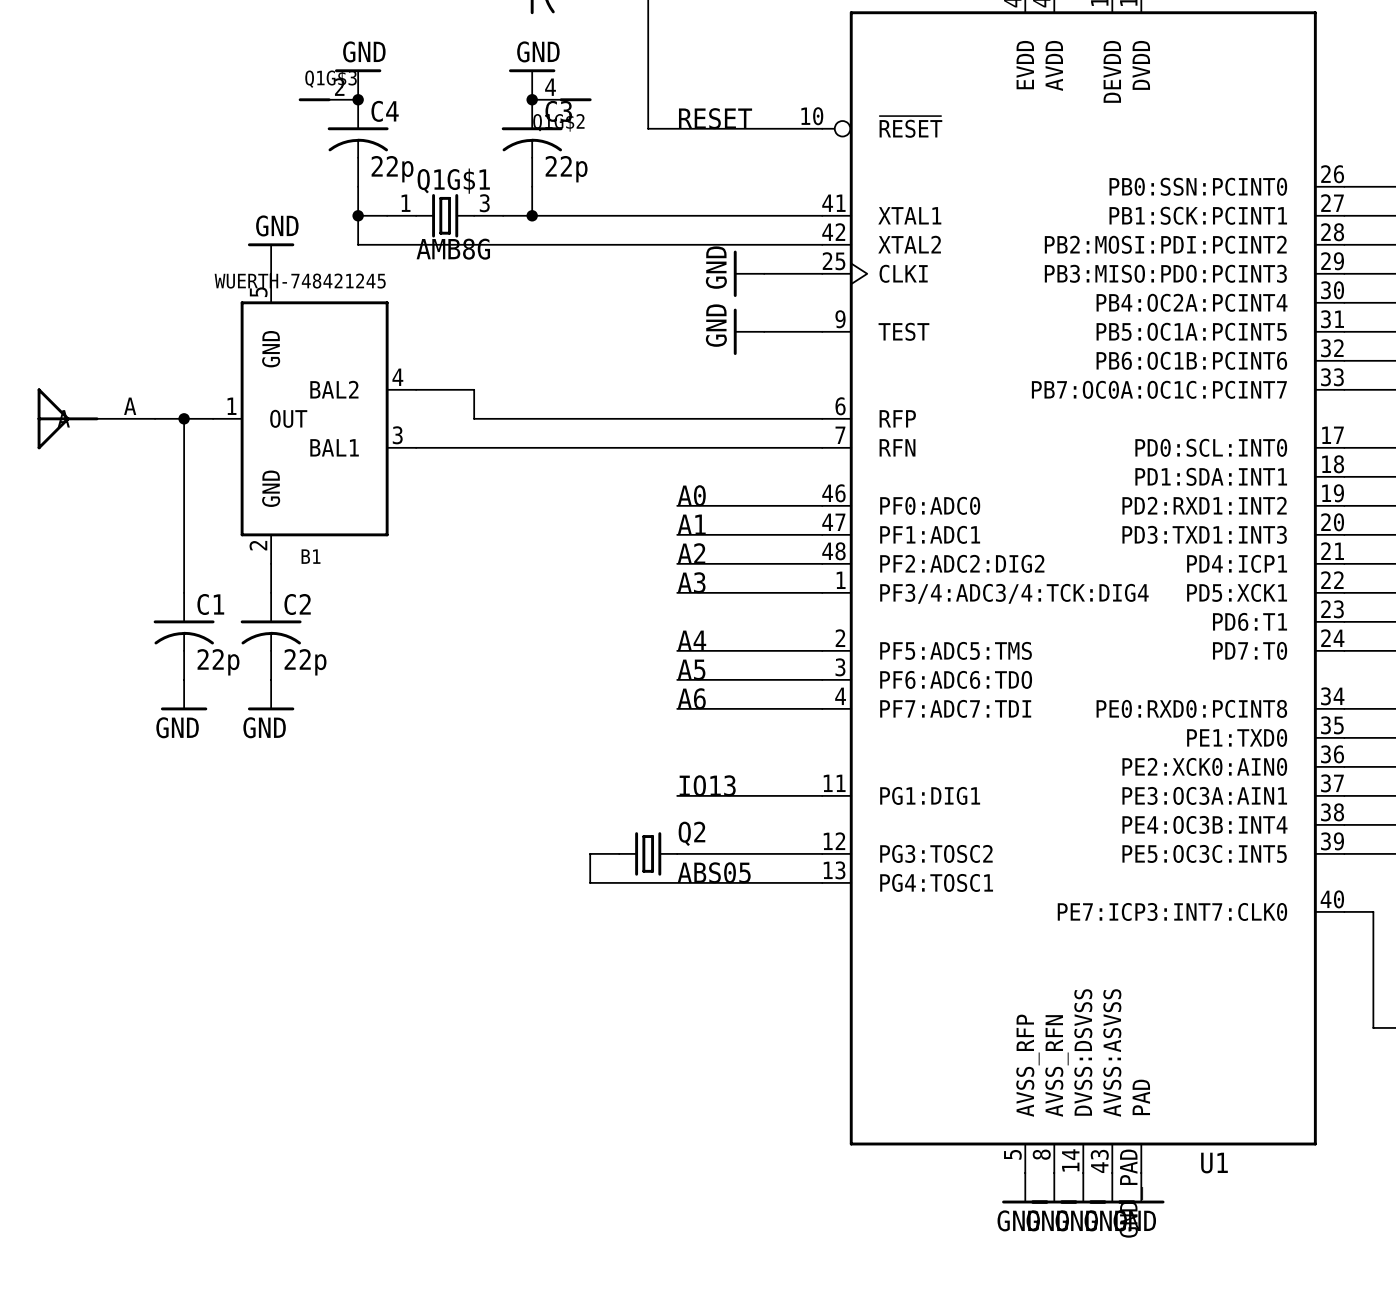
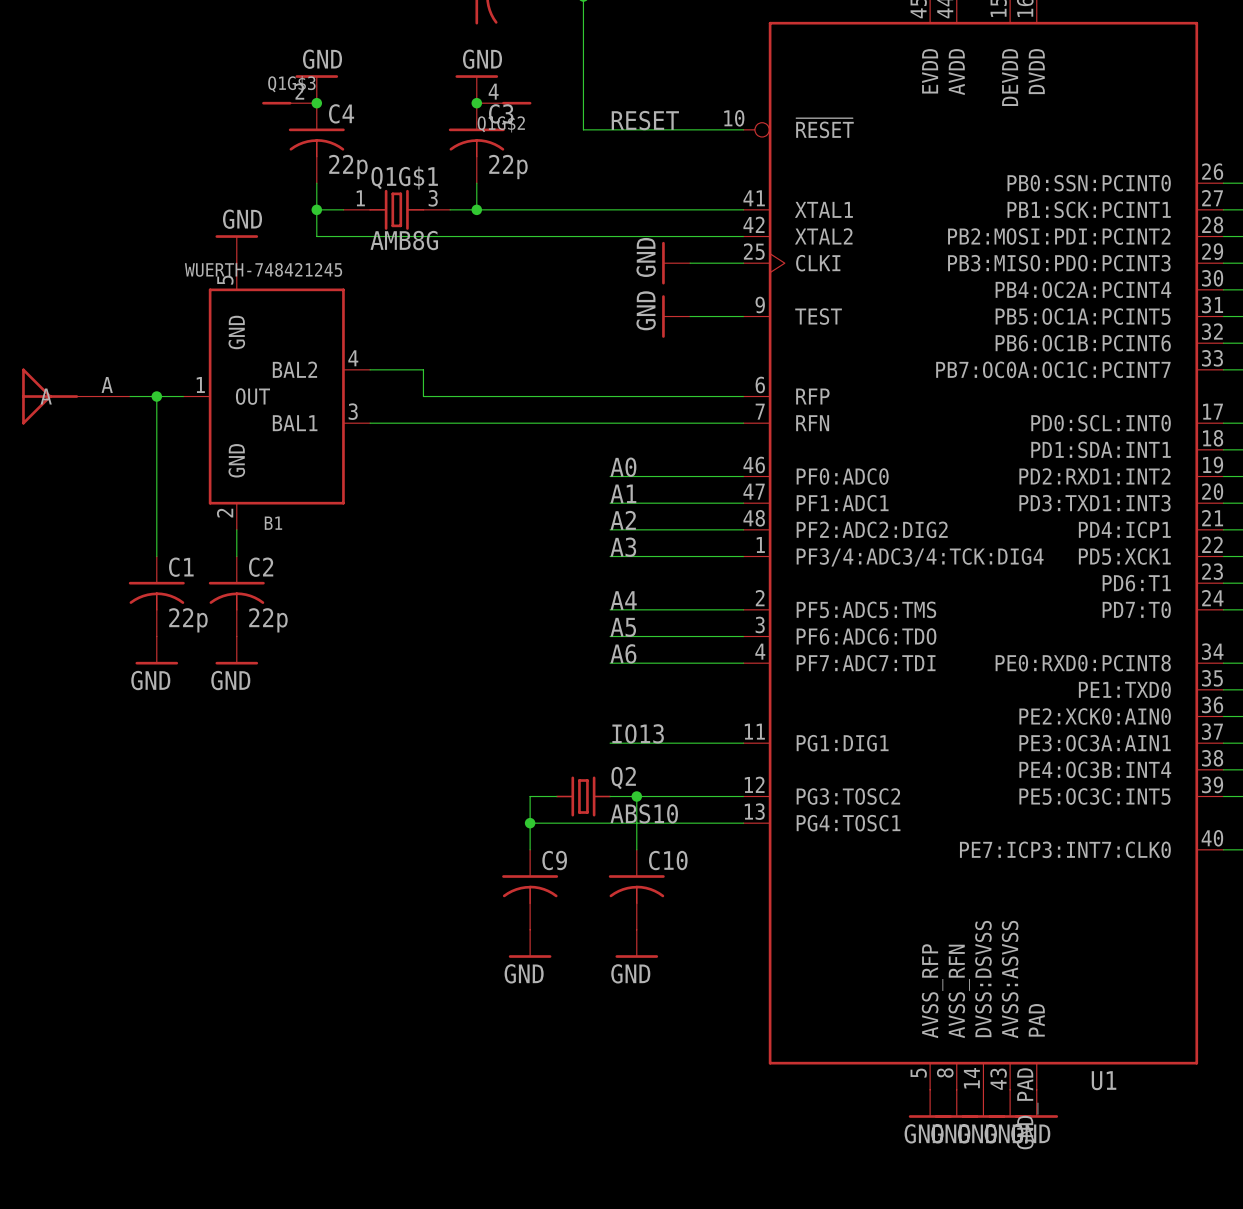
wire: none -> (636, 796) (636, 849)
junction: none -> (636, 796)
Q2 value: ABS05 (714, 872) -> ABS10 (644, 813)
wire: none -> (530, 823) (530, 849)
junction: none -> (530, 823)
C9: none -> (530, 889)
C10: none -> (636, 889)
power symbol: none -> GND (530, 943)
power symbol: none -> GND (636, 943)

